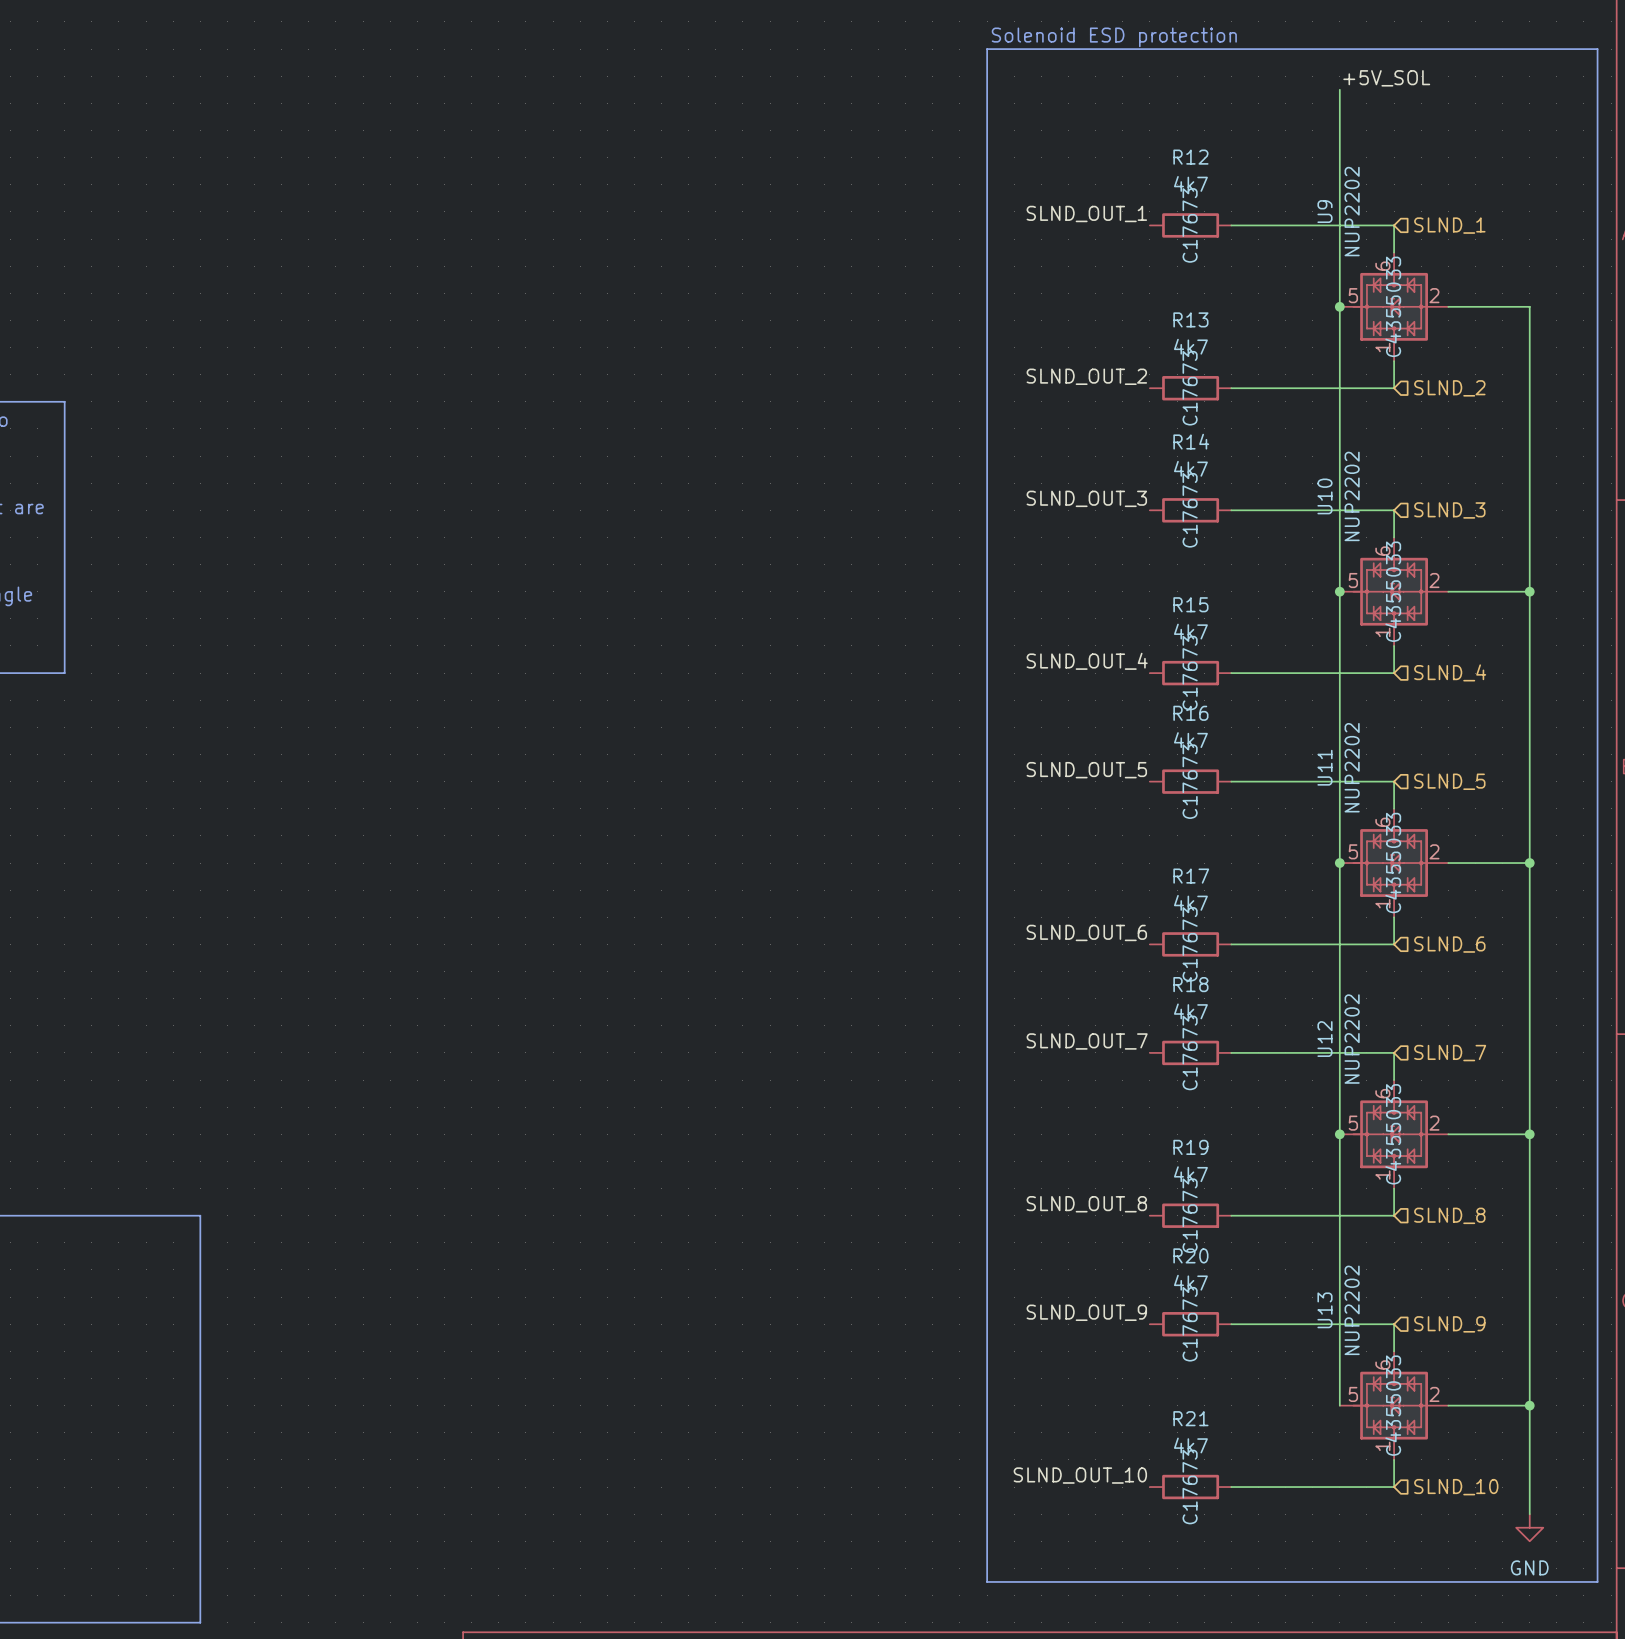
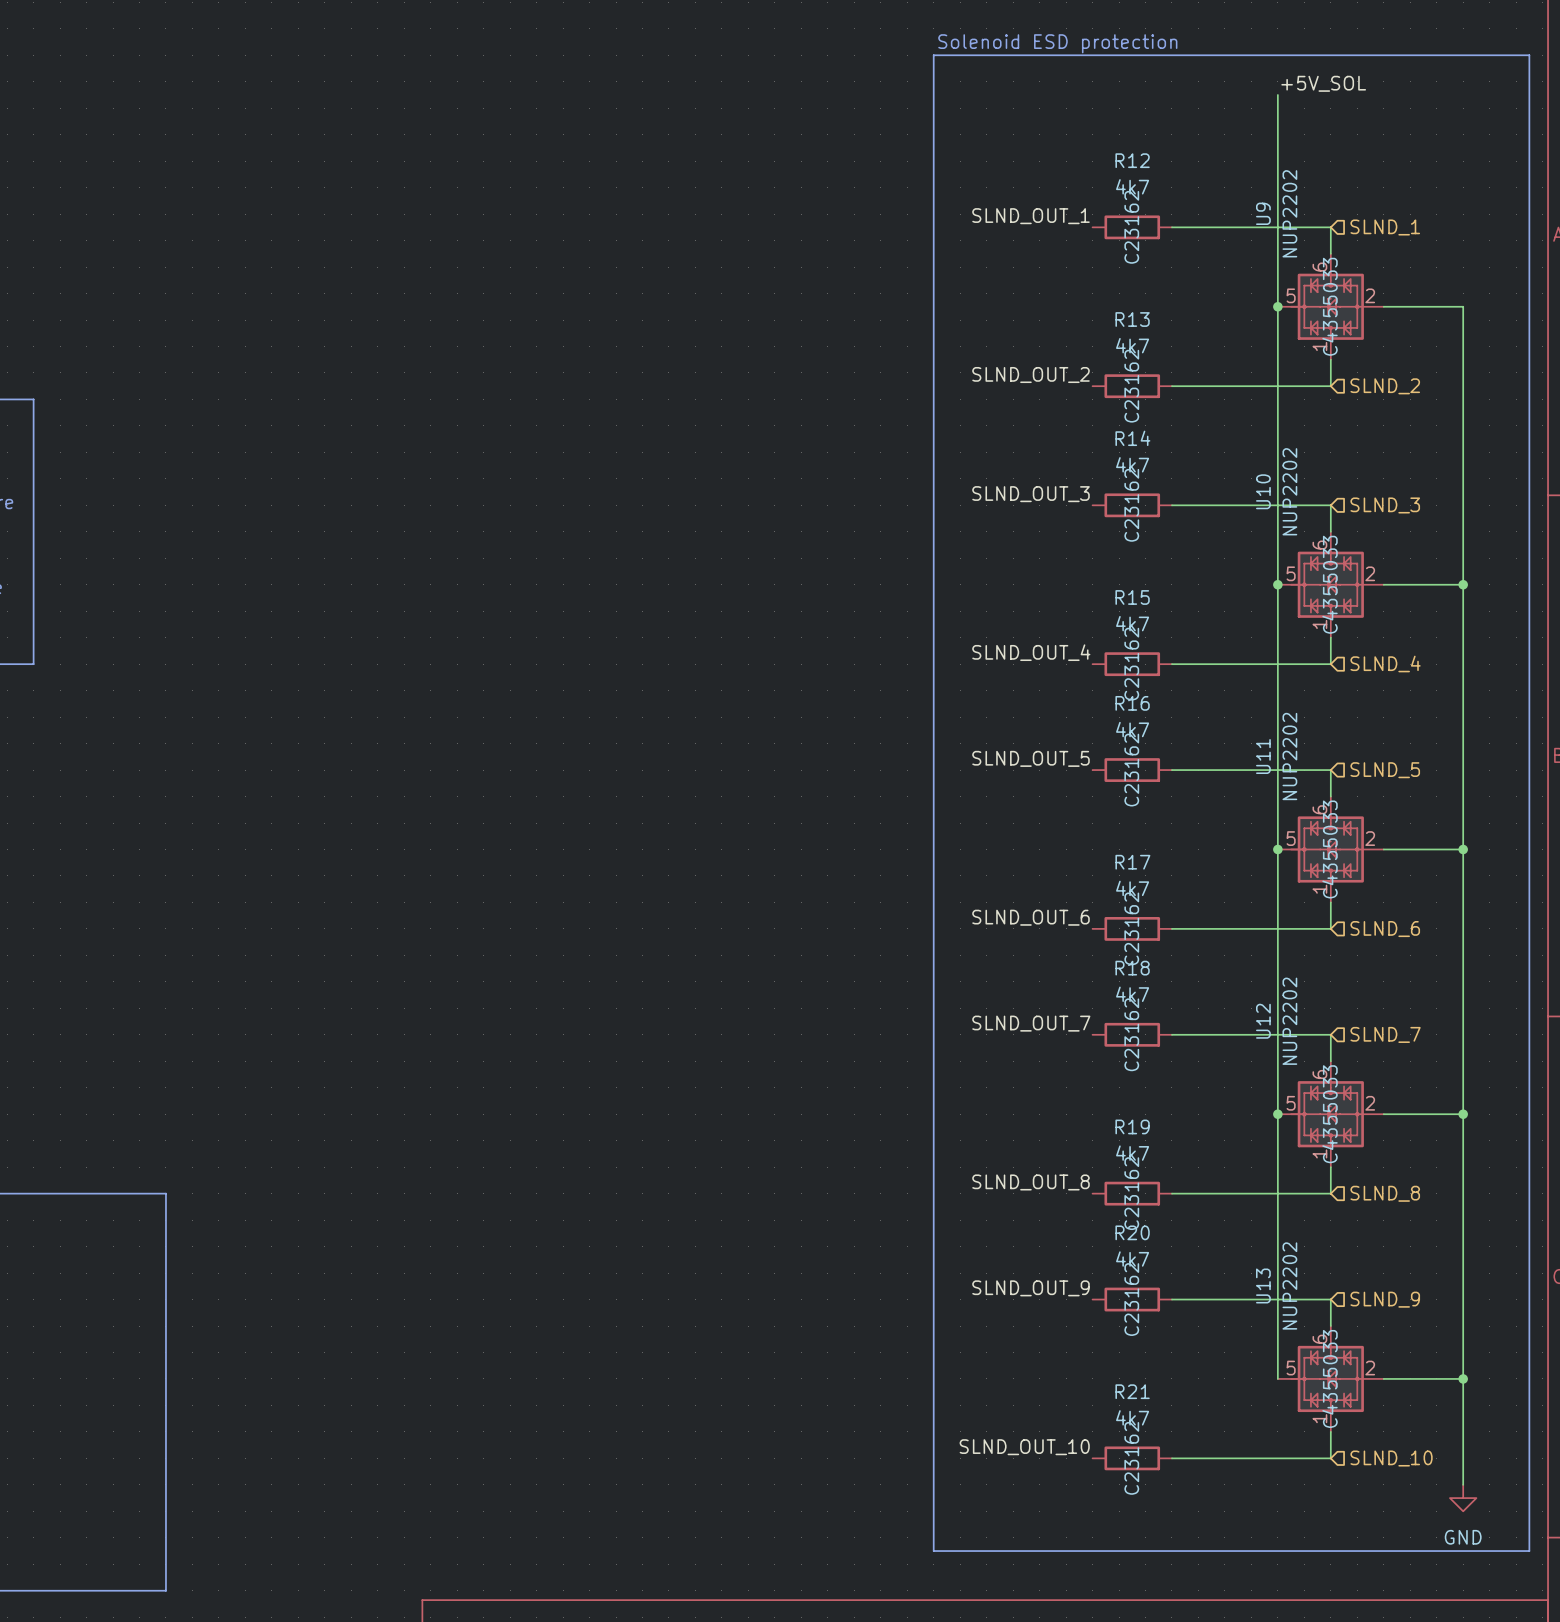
R12 text: C17673 (1190, 225) -> C23162 (1131, 227)
R13 text: C17673 (1190, 388) -> C23162 (1131, 386)
R14 text: C17673 (1190, 510) -> C23162 (1131, 505)
R15 text: C17673 (1190, 673) -> C23162 (1131, 664)
R16 text: C17673 (1190, 781) -> C23162 (1131, 770)
R17 text: C17673 (1190, 944) -> C23162 (1131, 928)
R18 text: C17673 (1190, 1052) -> C23162 (1131, 1034)
R19 text: C17673 (1190, 1215) -> C23162 (1131, 1193)
R20 text: C17673 (1190, 1324) -> C23162 (1131, 1299)
R21 text: C17673 (1190, 1487) -> C23162 (1131, 1458)

